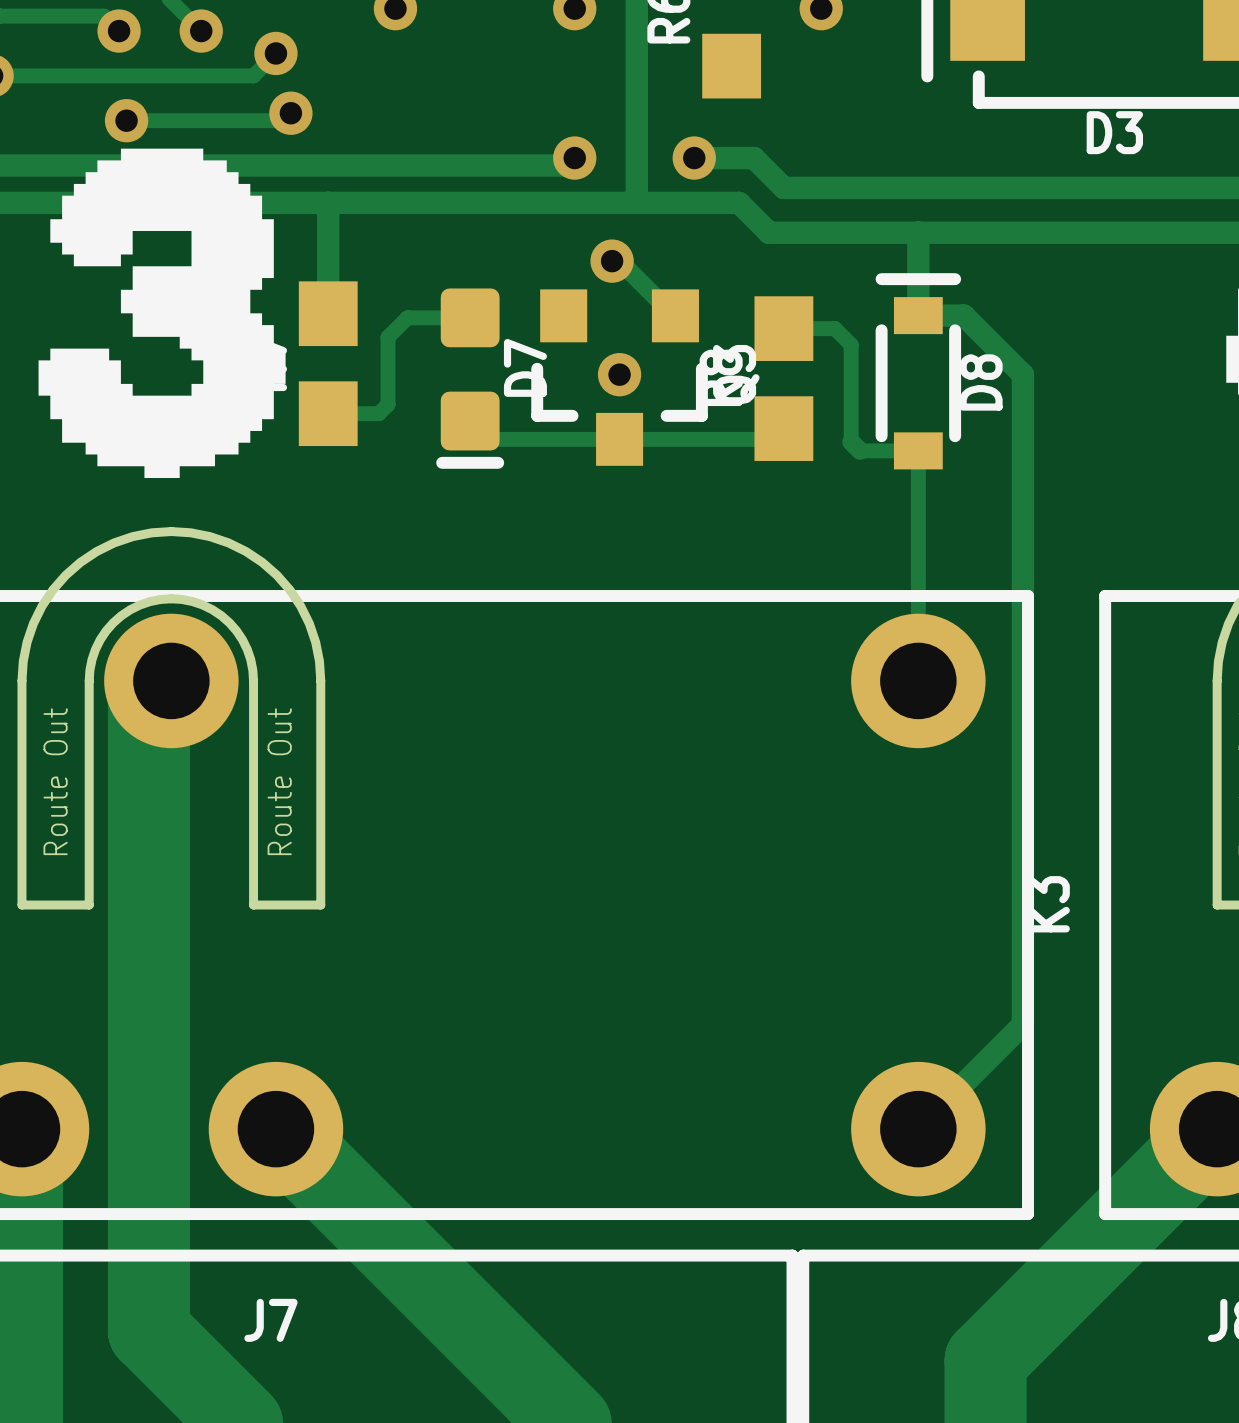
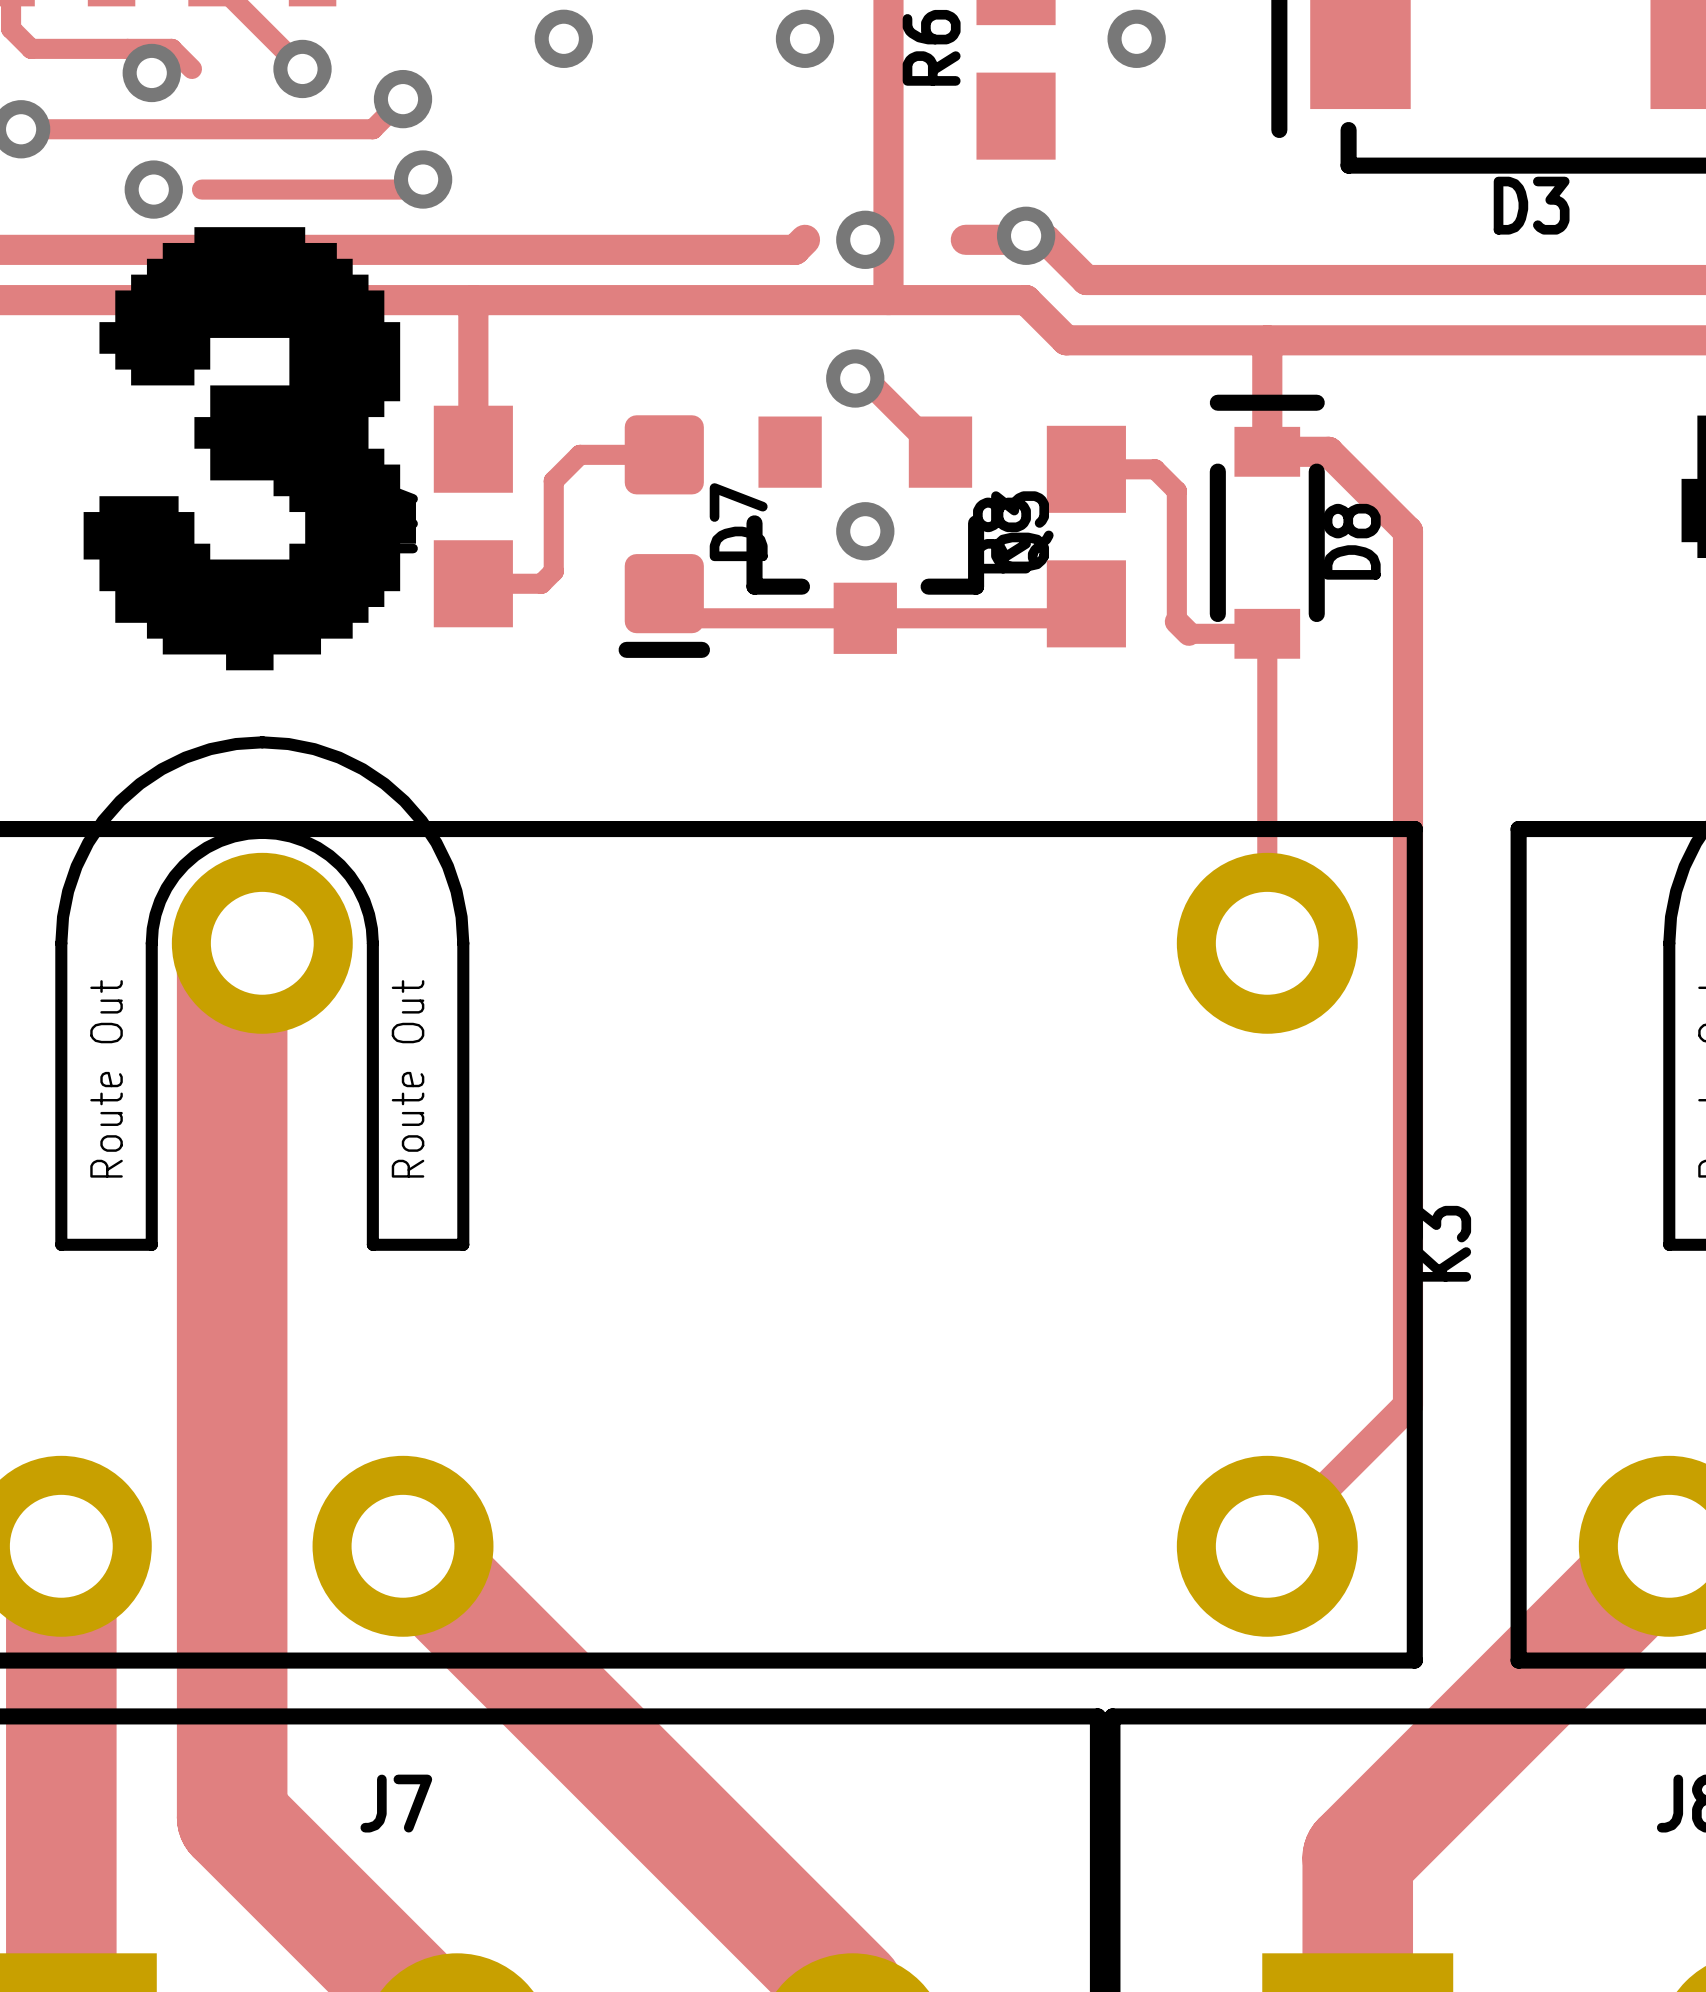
via position: (119, 31) -> (151, 72)
via position: (126, 120) -> (153, 189)
via: none -> (1026, 235)
via: (574, 158) -> none
via: none -> (865, 239)
via: (694, 158) -> none

